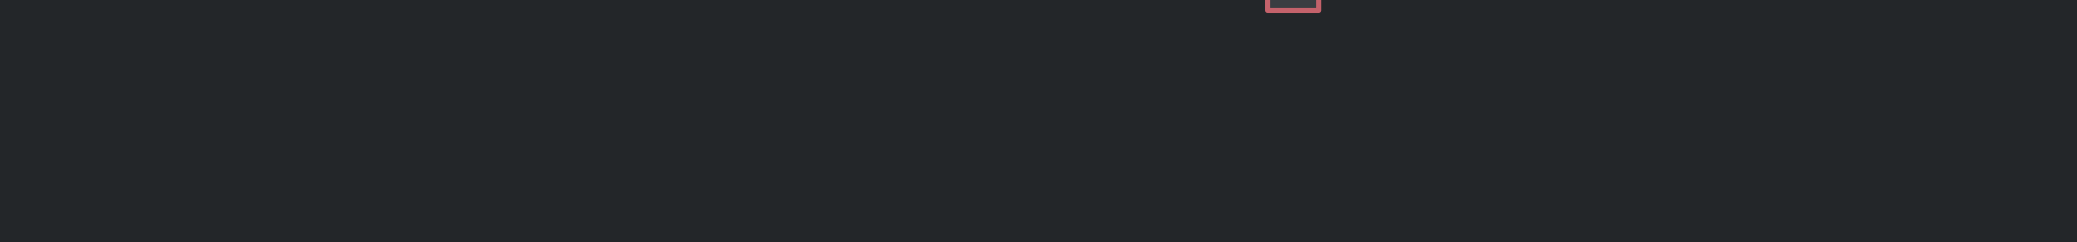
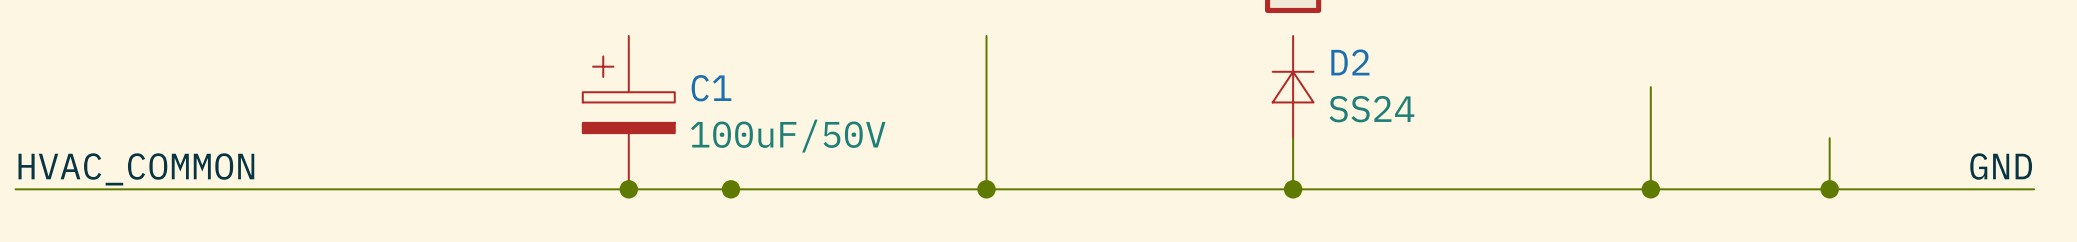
wire: none -> (986, 36) (986, 189)
D2: none -> SS24 (1293, 87)
wire: none -> (1650, 87) (1650, 189)
C1: none -> 100uF/50V (628, 112)
wire: none -> (1293, 138) (1293, 189)
wire: none -> (1829, 138) (1829, 189)
label: none -> GND (2001, 166)
label: none -> HVAC_COMMON (136, 169)
wire: none -> (15, 189) (2034, 189)
junction: none -> (628, 189)
junction: none -> (731, 189)
junction: none -> (986, 189)
junction: none -> (1293, 189)
junction: none -> (1650, 189)
junction: none -> (1829, 189)

